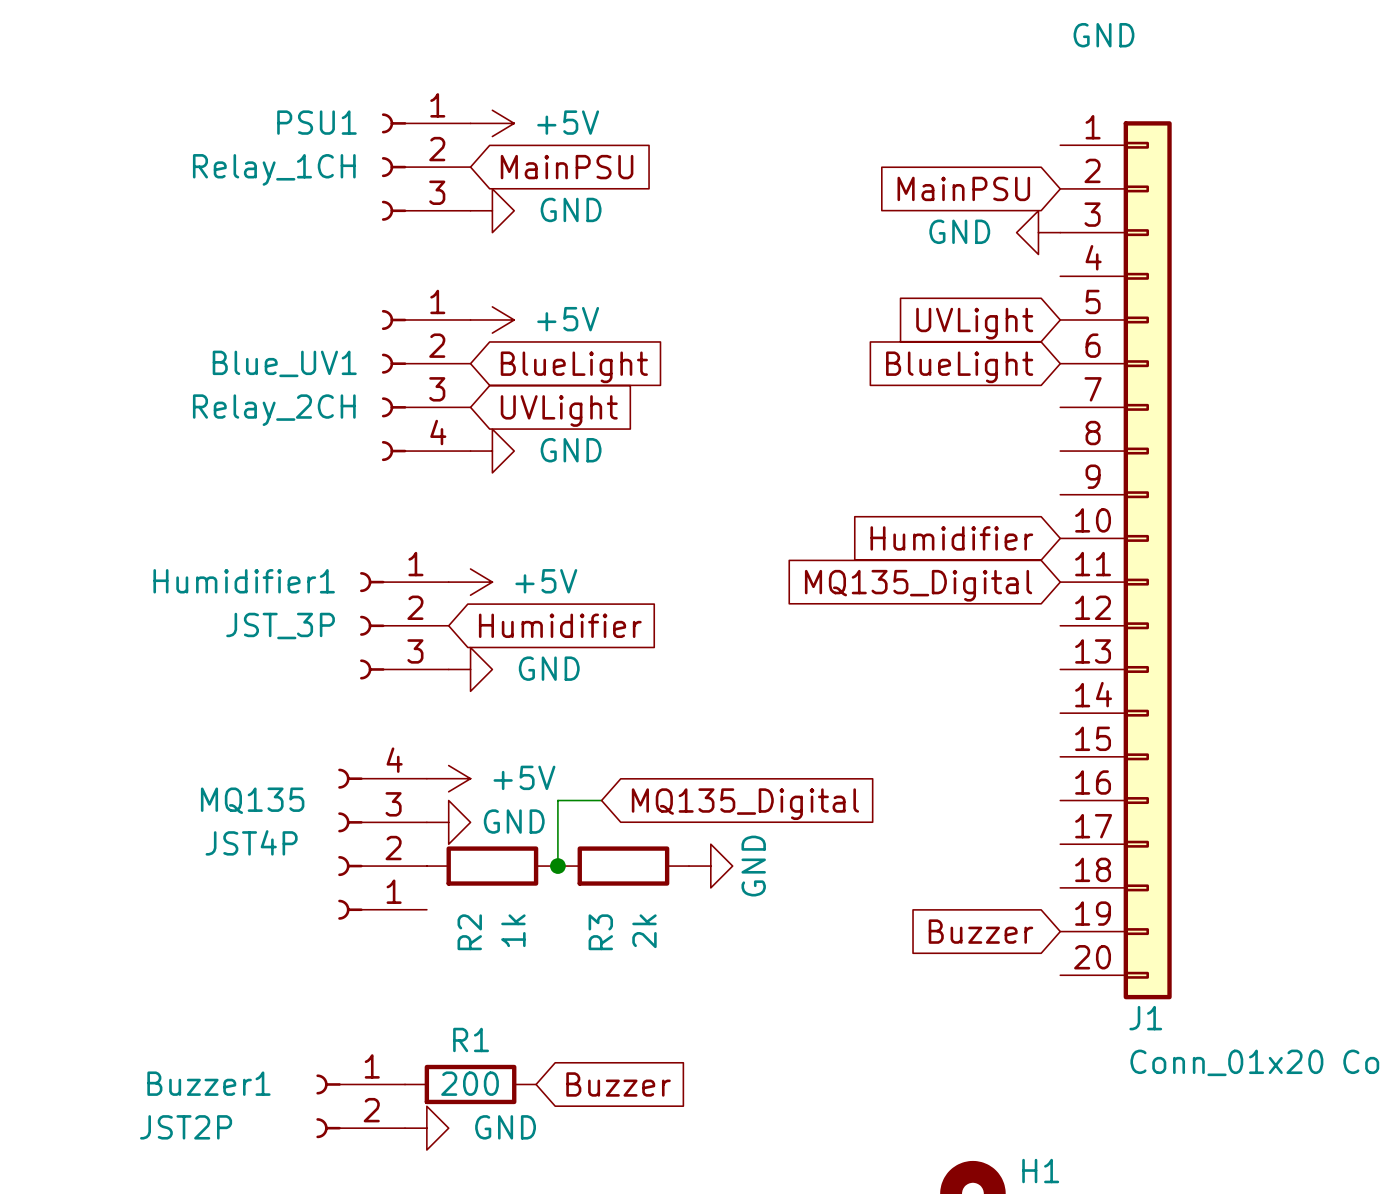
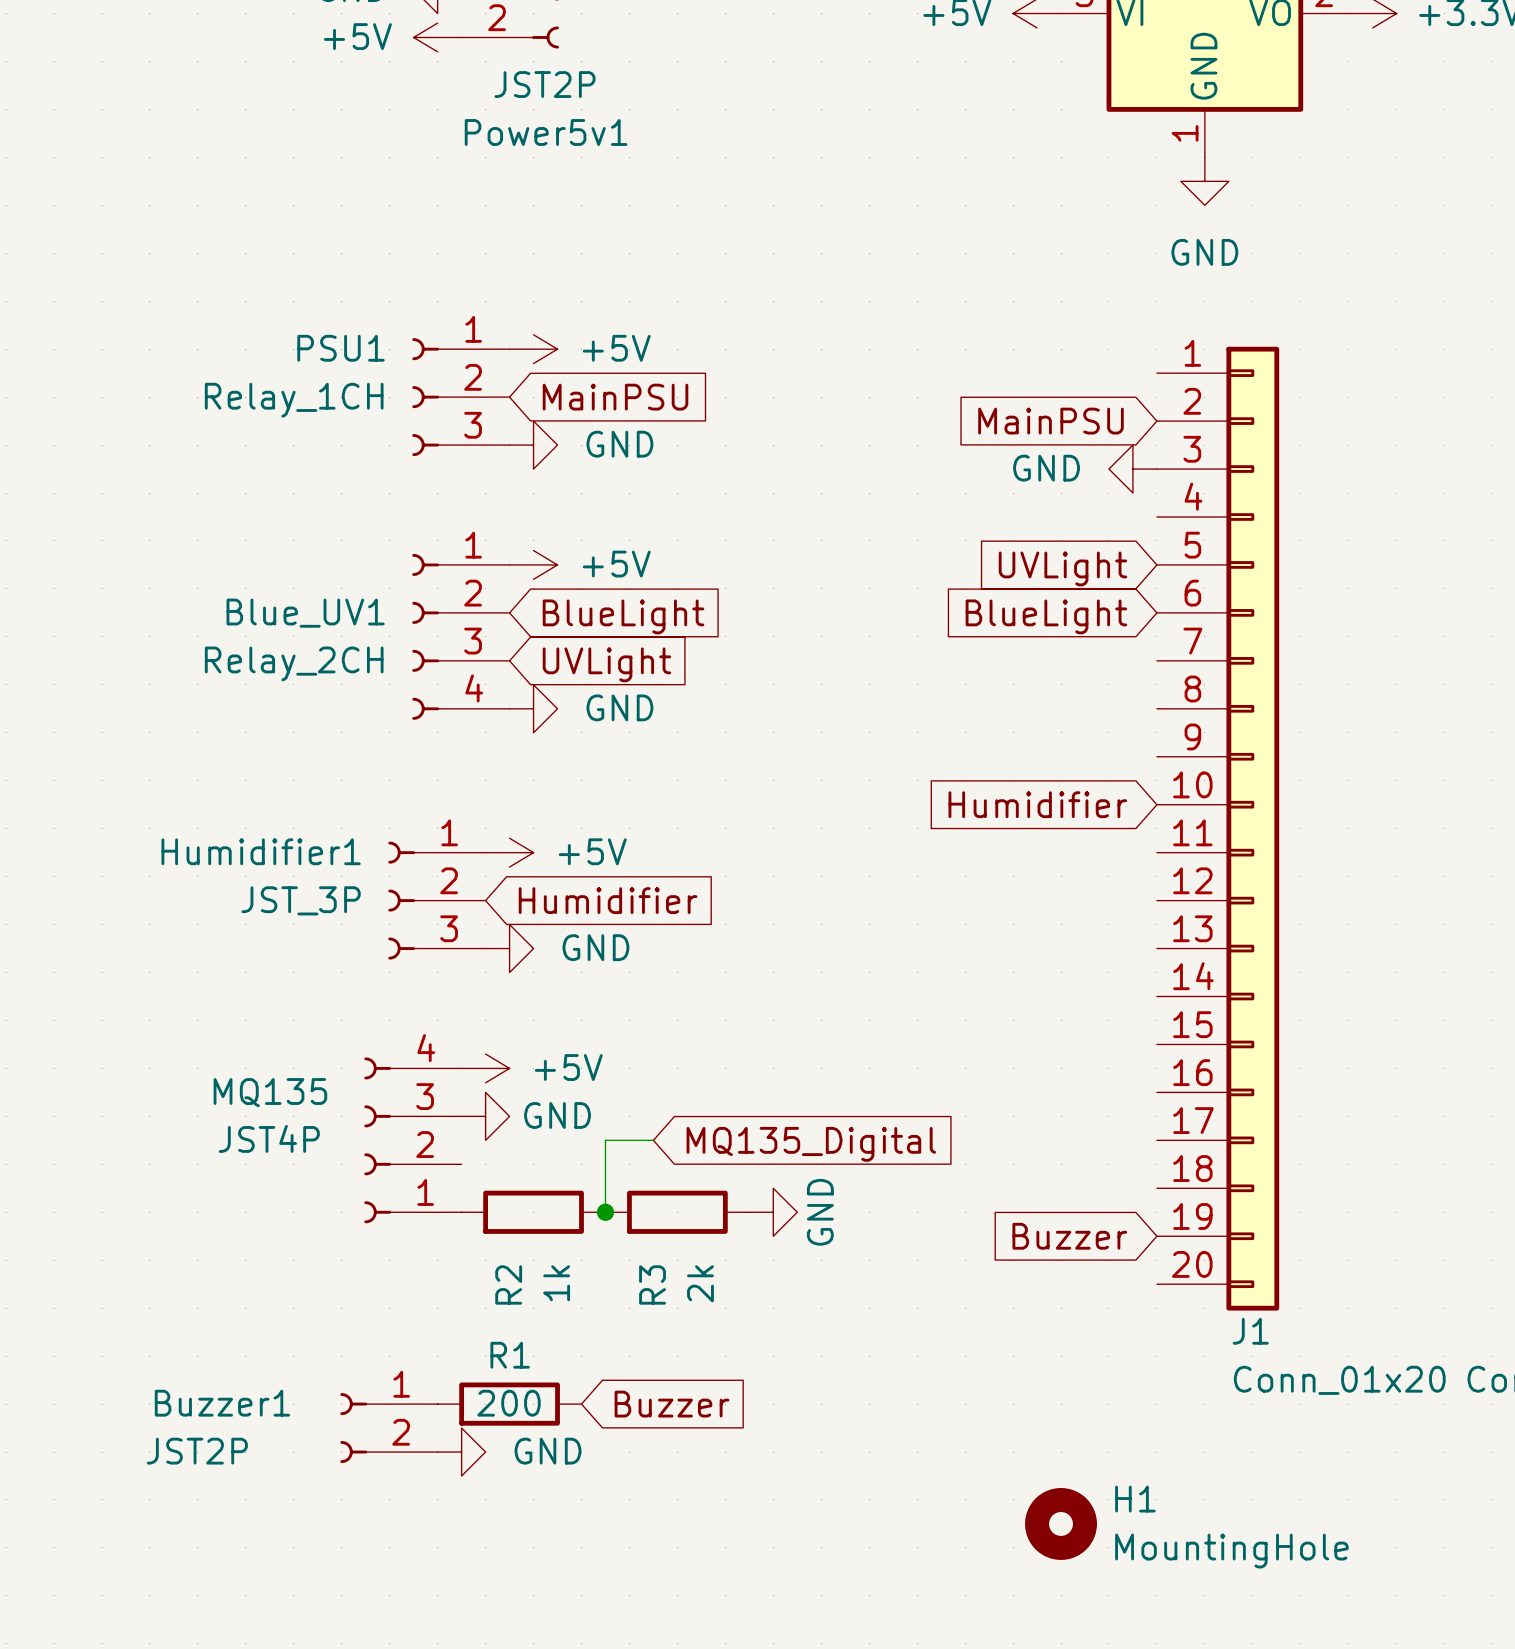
global label: MQ135_Digital (918, 585) -> none
wire: (601, 800) (557, 800) (557, 844) -> (653, 1140) (605, 1140)
global label position: MQ135_Digital (745, 804) -> MQ135_Digital (811, 1144)
R2 position: (492, 866) -> (533, 1212)
wire: none -> (605, 1164) (605, 1212)
junction position: (557, 866) -> (605, 1212)
R3 position: (623, 866) -> (677, 1212)
power symbol position: GND (710, 866) -> GND (773, 1212)

